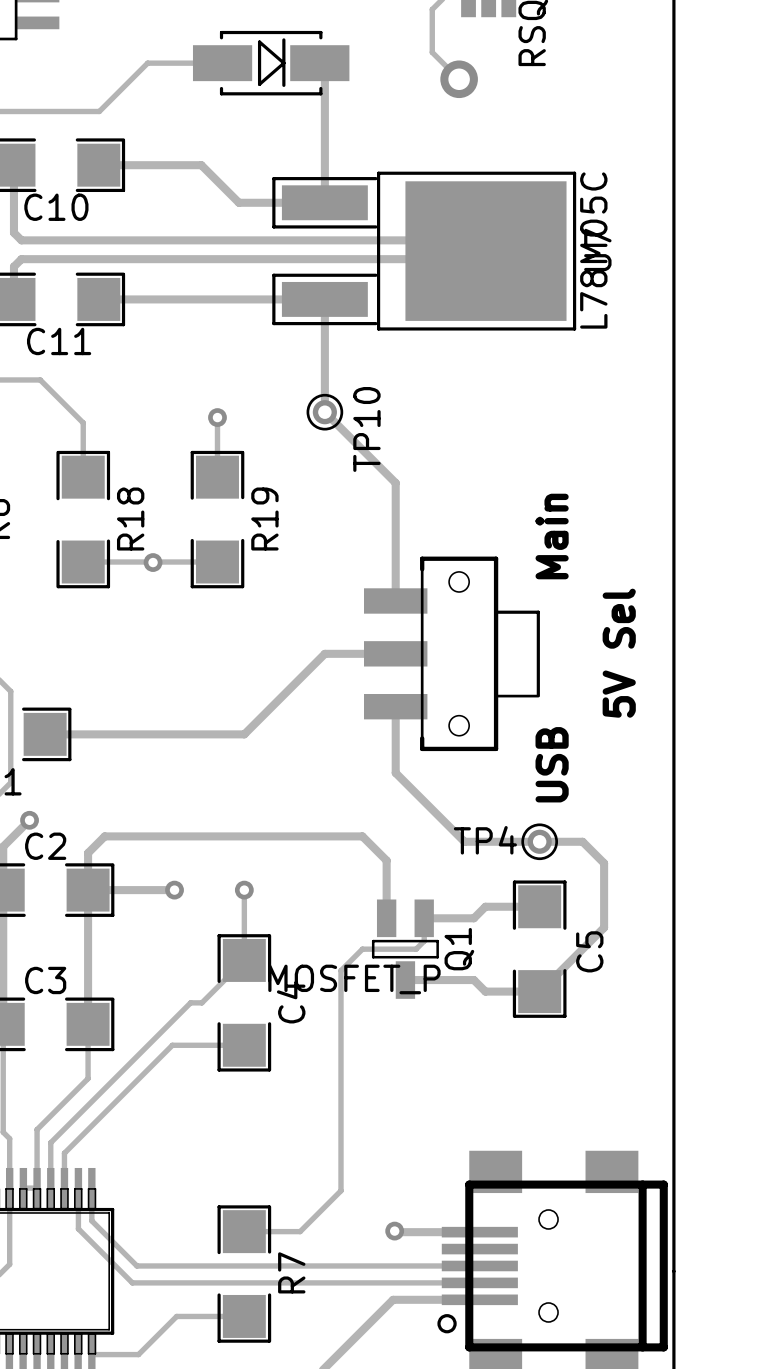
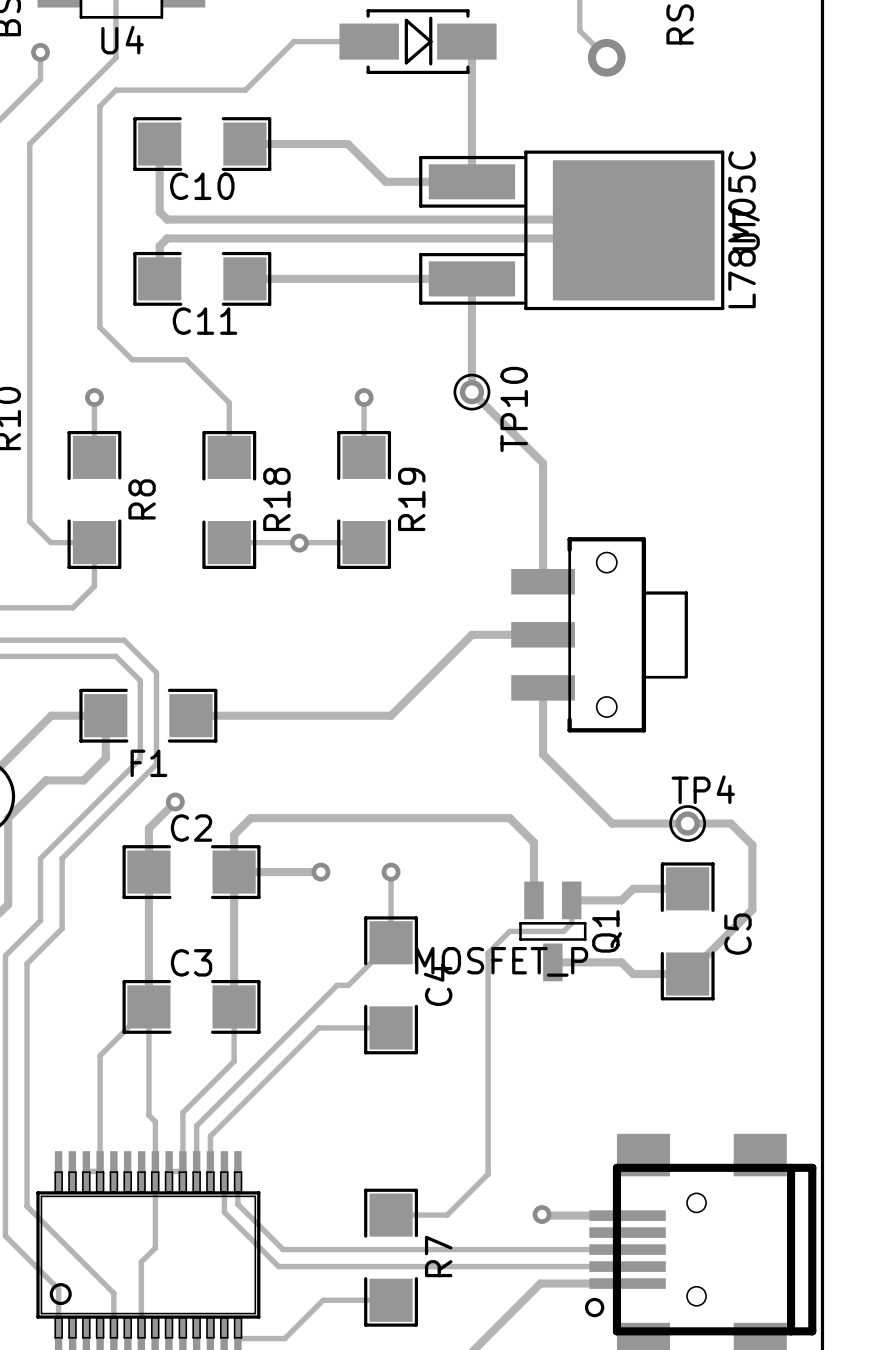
text: Main (552, 536) -> none
text: 5V Sel (619, 653) -> none
text: USB (552, 764) -> none
TP4 name position: TP4 (485, 840) -> TP4 (703, 789)

